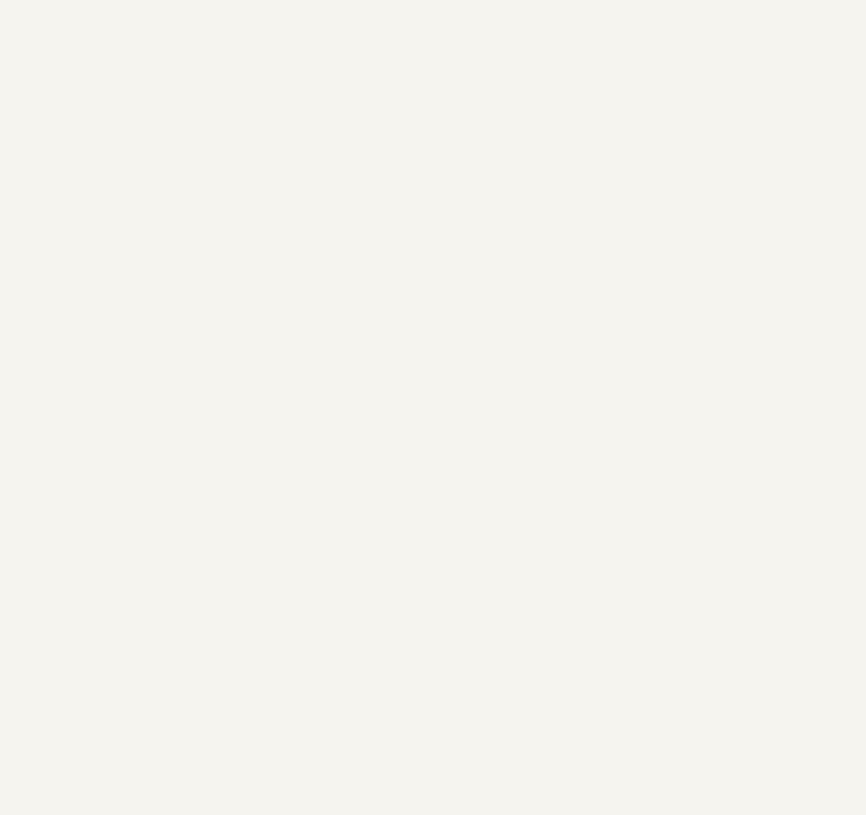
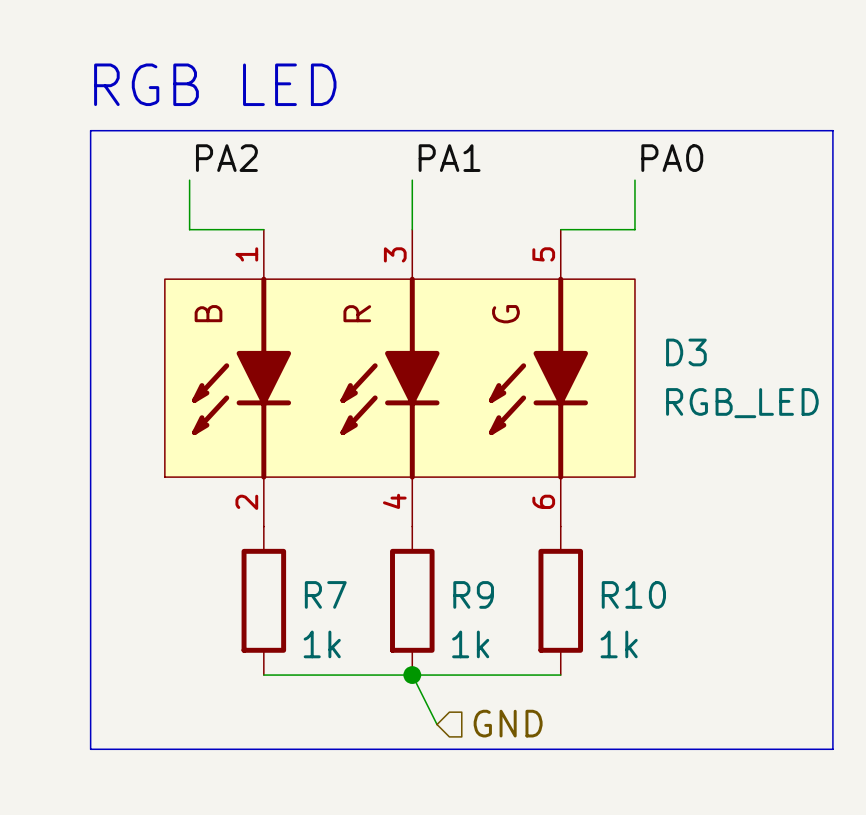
text: none -> RGB LED (215, 84)
line: none -> (90, 130) (832, 130) (832, 749) (90, 749) (90, 130)
label: none -> PA2 (226, 158)
label: none -> PA1 (449, 158)
label: none -> PA0 (672, 158)
wire: none -> (189, 180) (189, 229) (263, 229)
wire: none -> (412, 180) (412, 229)
wire: none -> (634, 180) (634, 229) (560, 229)
D3: none -> RGB_LED (399, 378)
R7: none -> 1k (263, 600)
R9: none -> 1k (412, 600)
R10: none -> 1k (560, 600)
wire: none -> (263, 675) (560, 675)
wire: none -> (412, 675) (437, 724)
junction: none -> (412, 675)
hierarchical label: none -> GND (508, 723)

